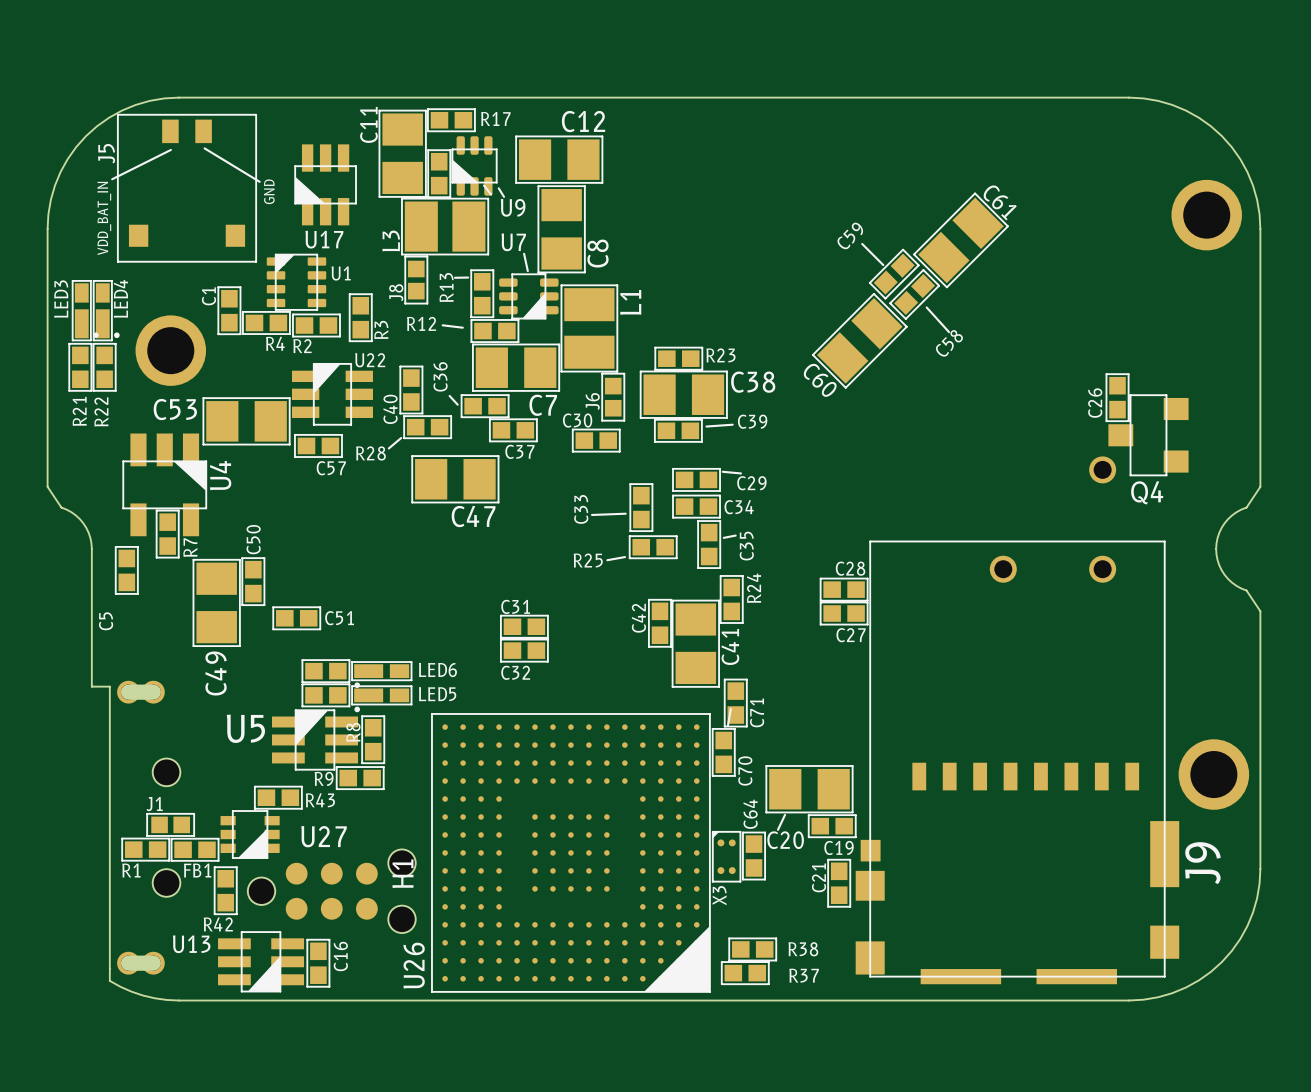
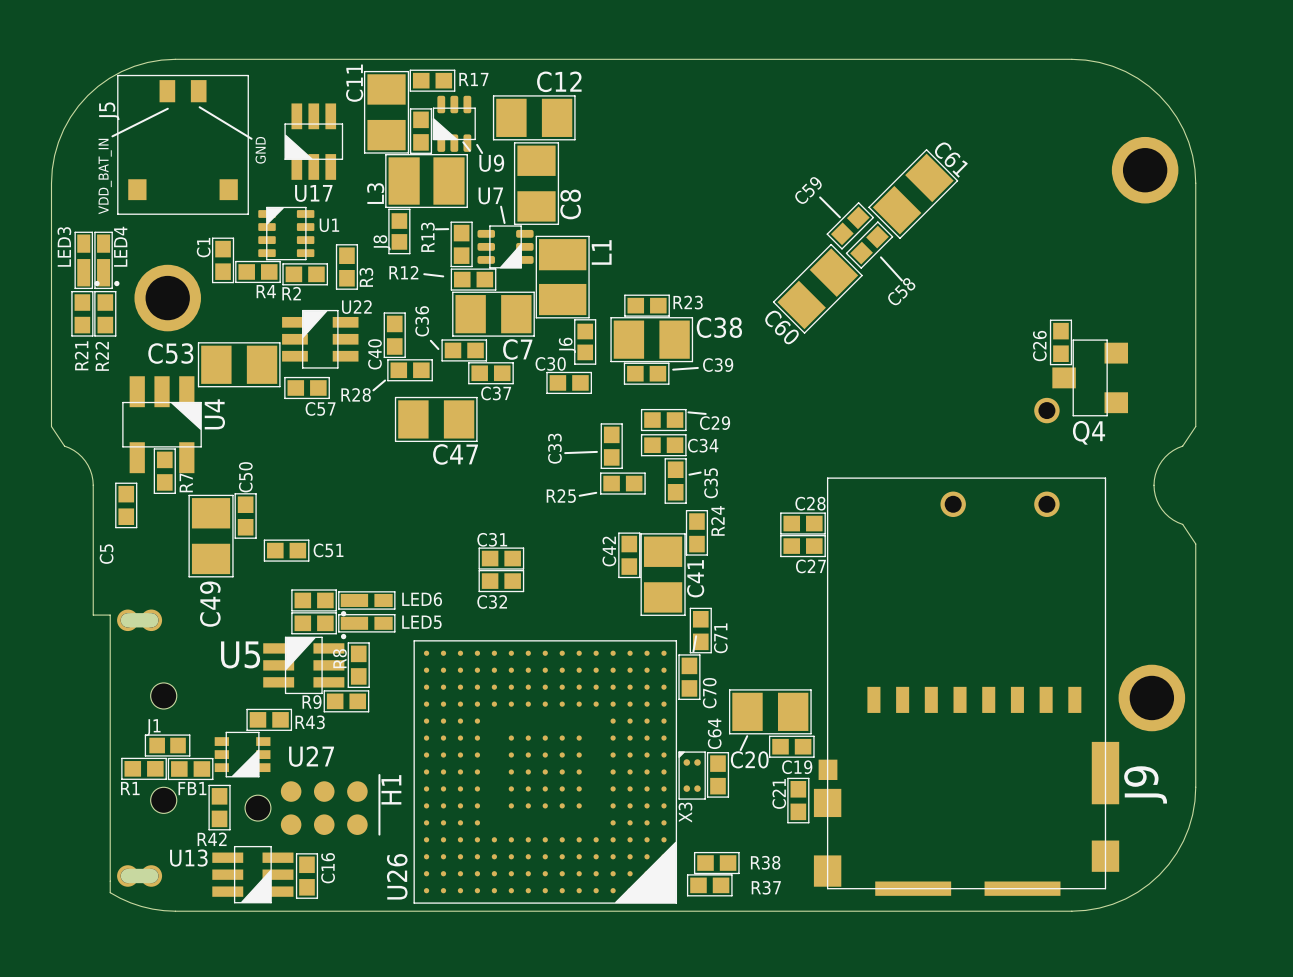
H1 footprint: [247, 849, 416, 934] -> [245, 773, 381, 836]

